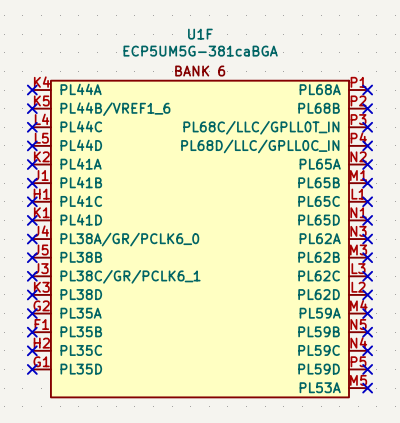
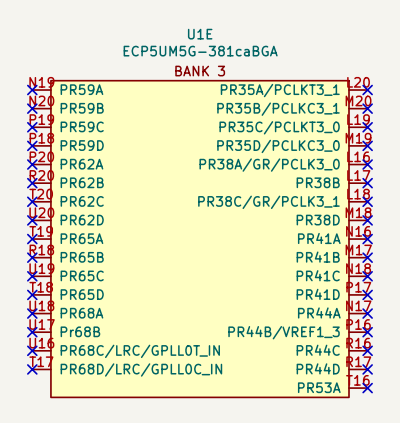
U1F name: U1F (200, 34) -> U1E (200, 34)
U1F symbol: [32, 80, 368, 398] -> [32, 80, 368, 398]

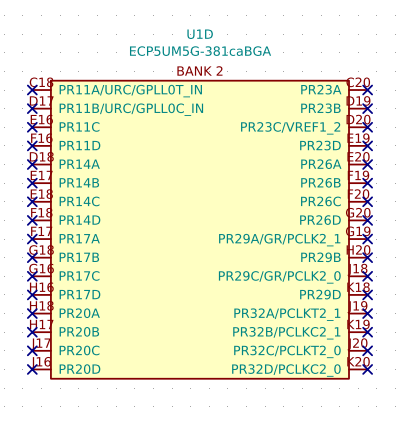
U1D: none -> ECP5UM5G-381caBGA (199, 229)
U1E: ECP5UM5G-381caBGA (199, 239) -> none
no-connect mark: (367, 388) -> none

